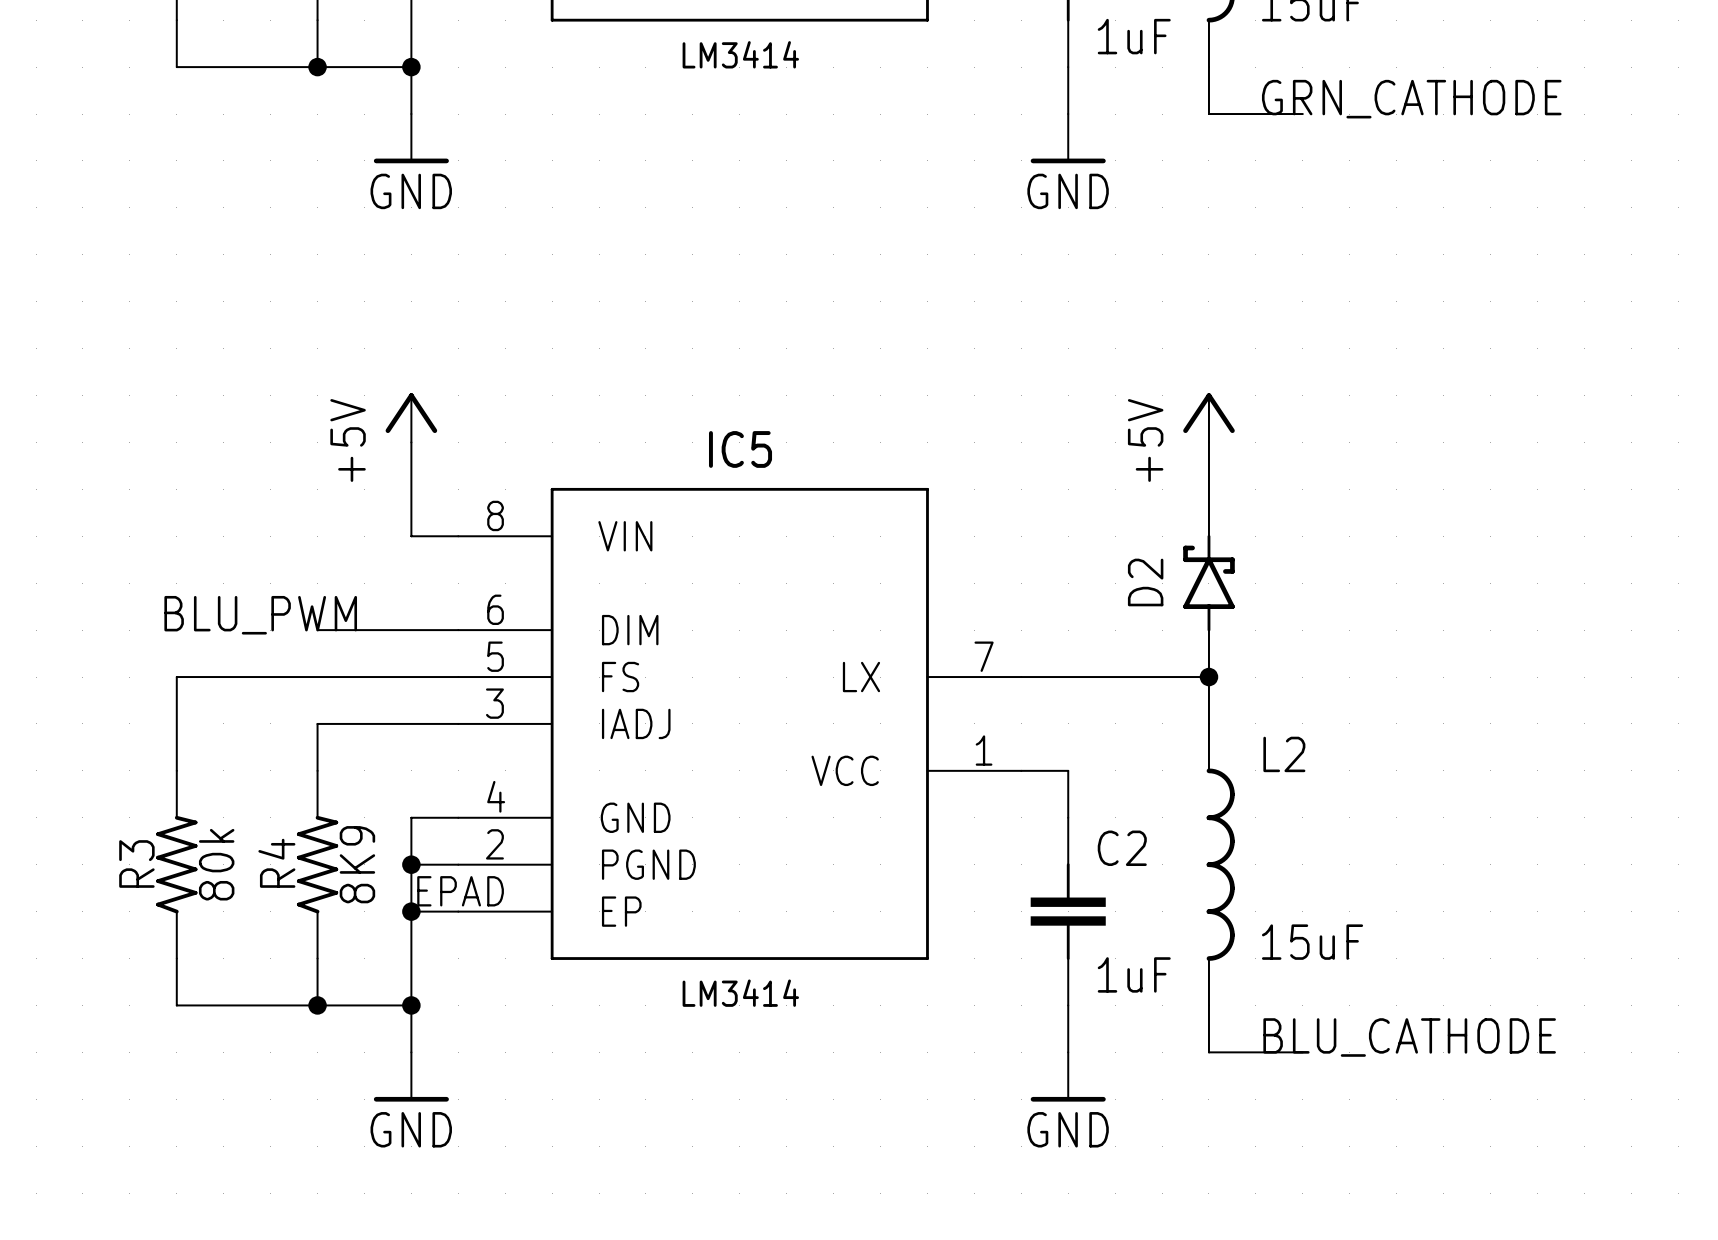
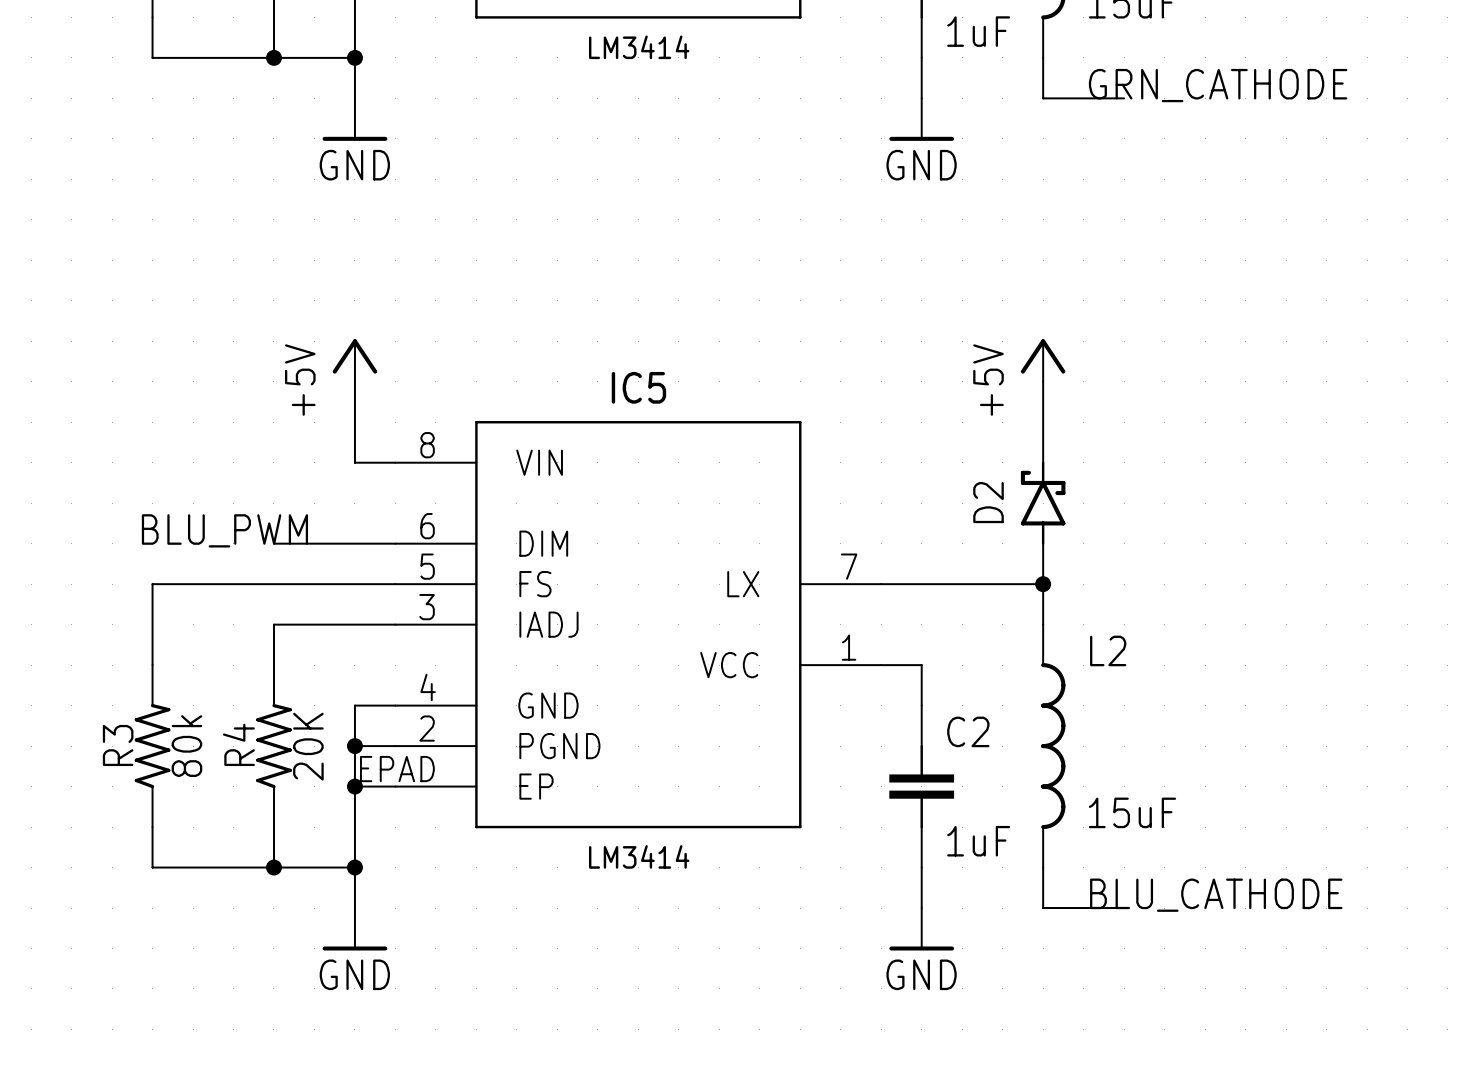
R4 value: 8K9 (357, 864) -> 20K (308, 746)

